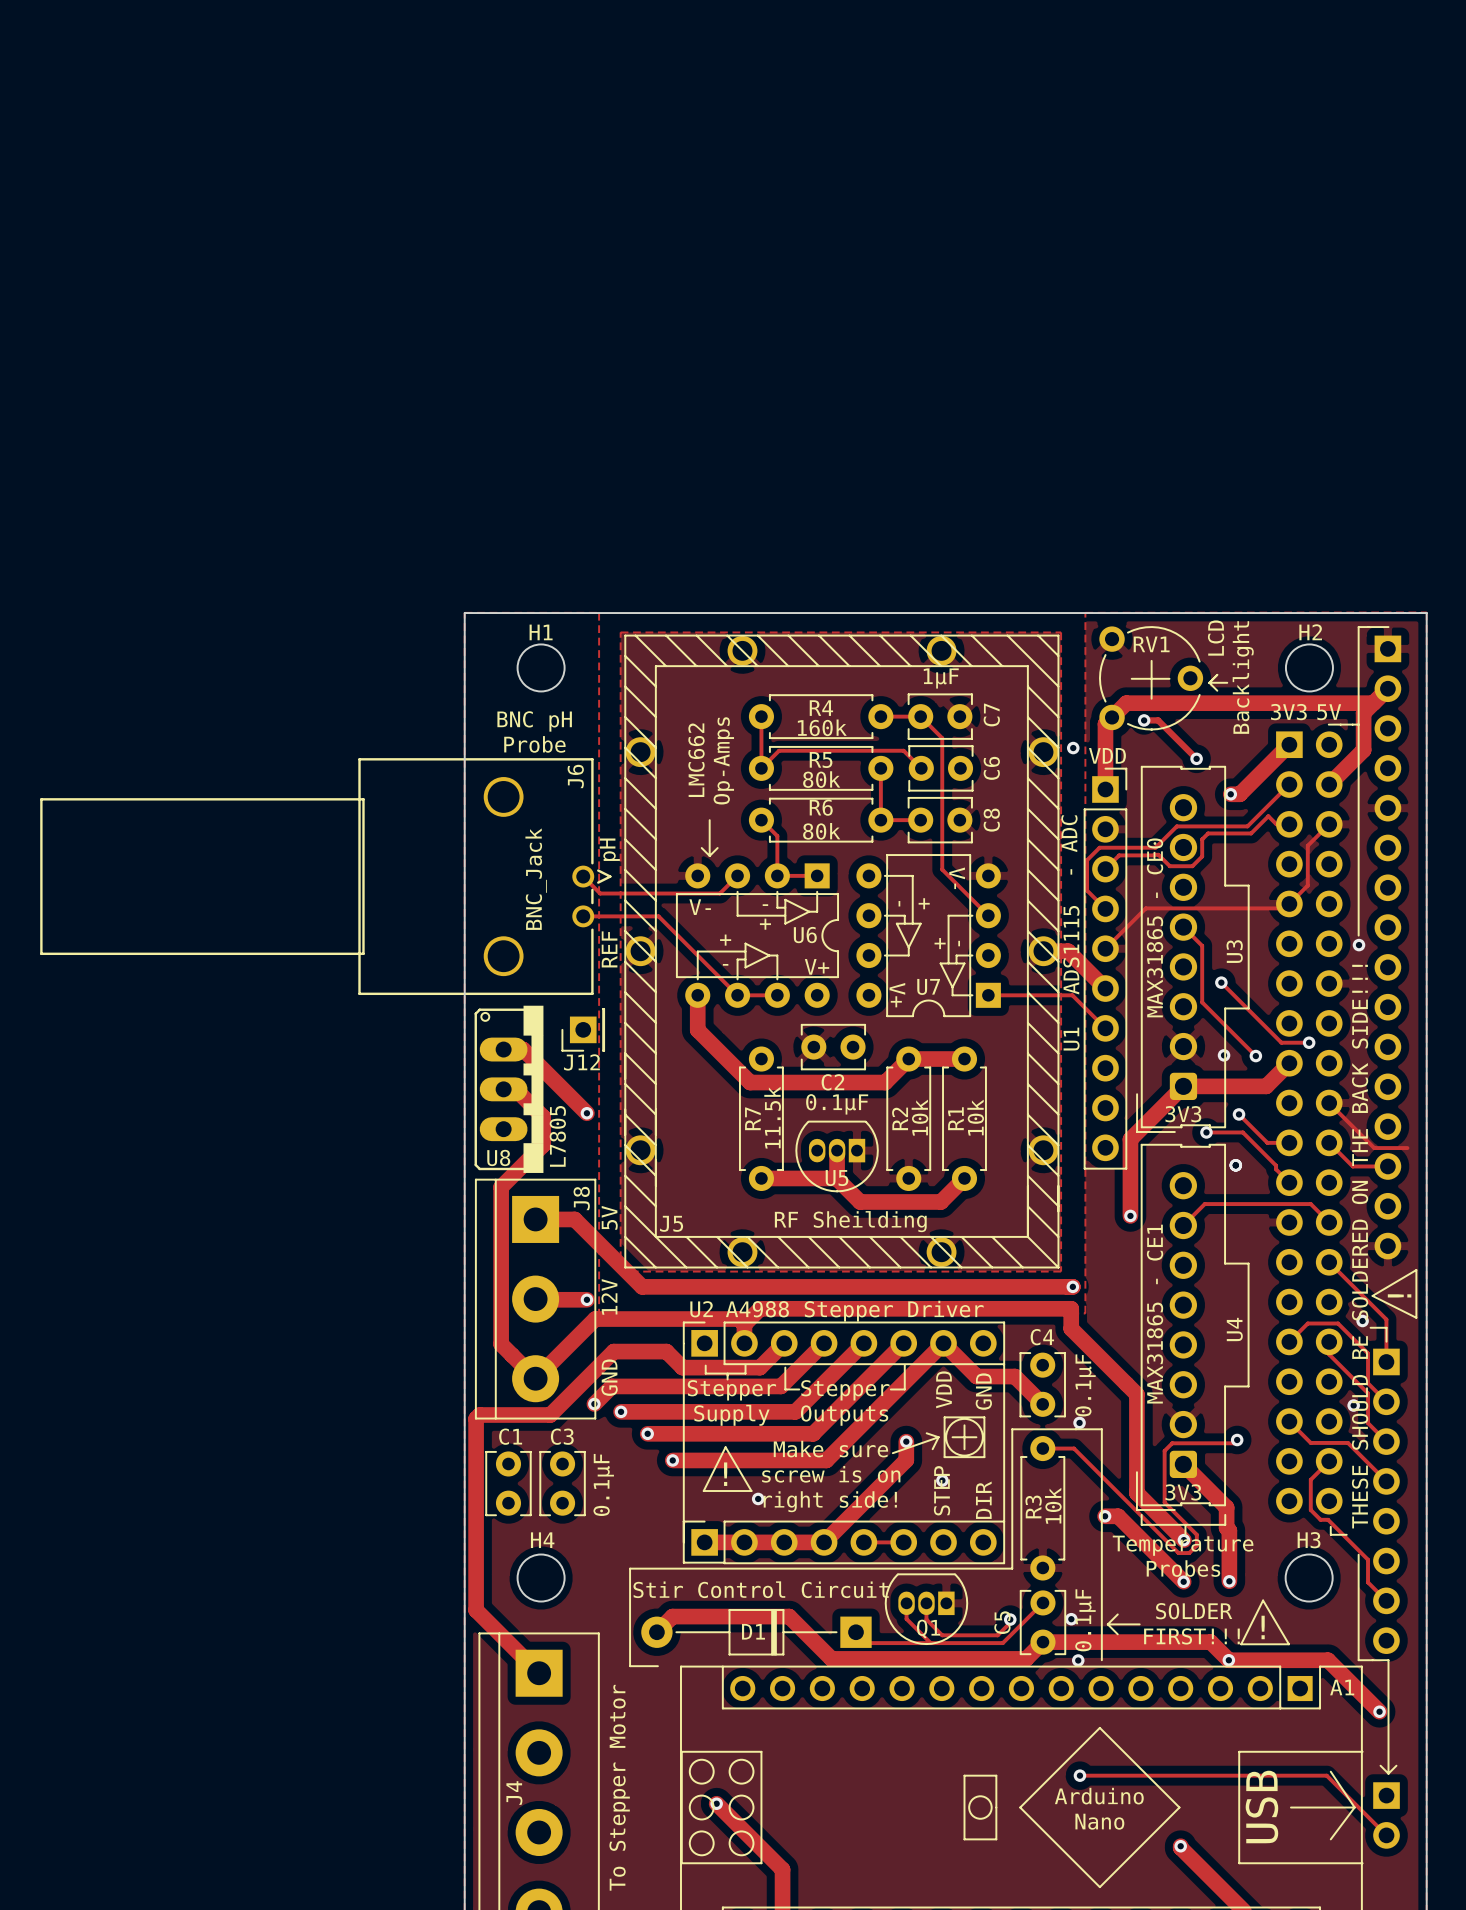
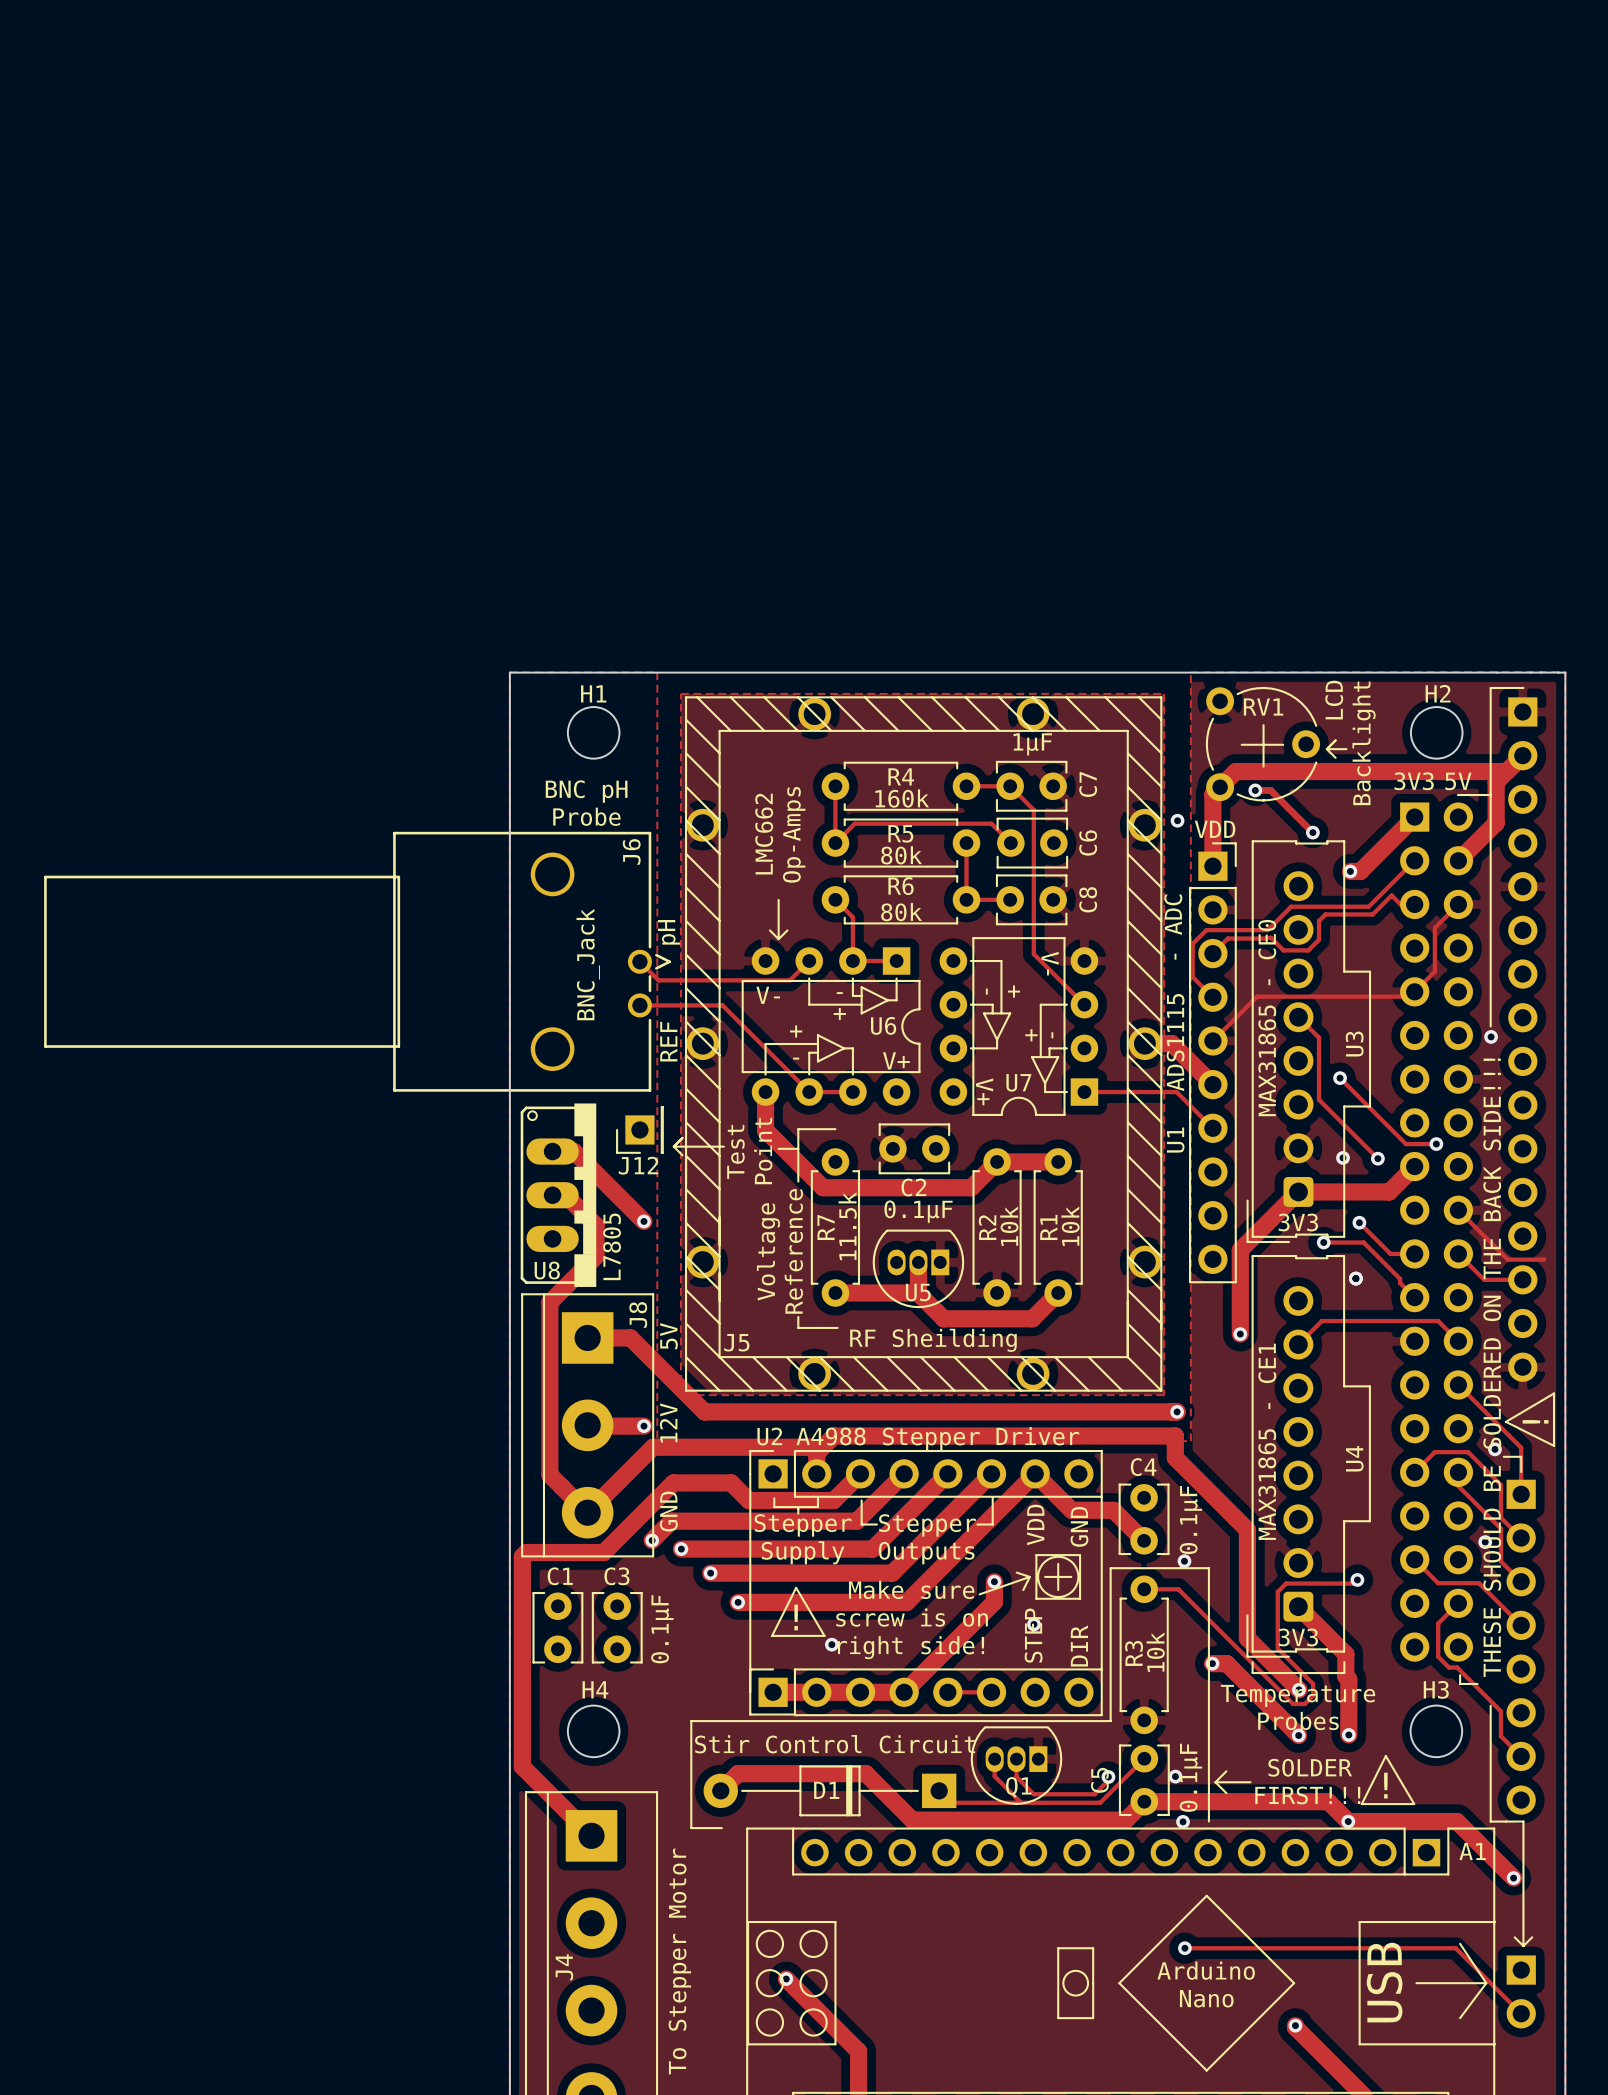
line: none -> (835, 1129) (798, 1129) (798, 1181)
line: none -> (673, 1146) (682, 1155)
line: none -> (673, 1146) (724, 1146)
line: none -> (778, 1148) (798, 1148)
text: none -> Test (735, 1151)
text: none -> Point (763, 1151)
text: none -> Voltage (768, 1251)
text: none -> Reference (793, 1251)
line: none -> (798, 1317) (798, 1327) (837, 1327)

